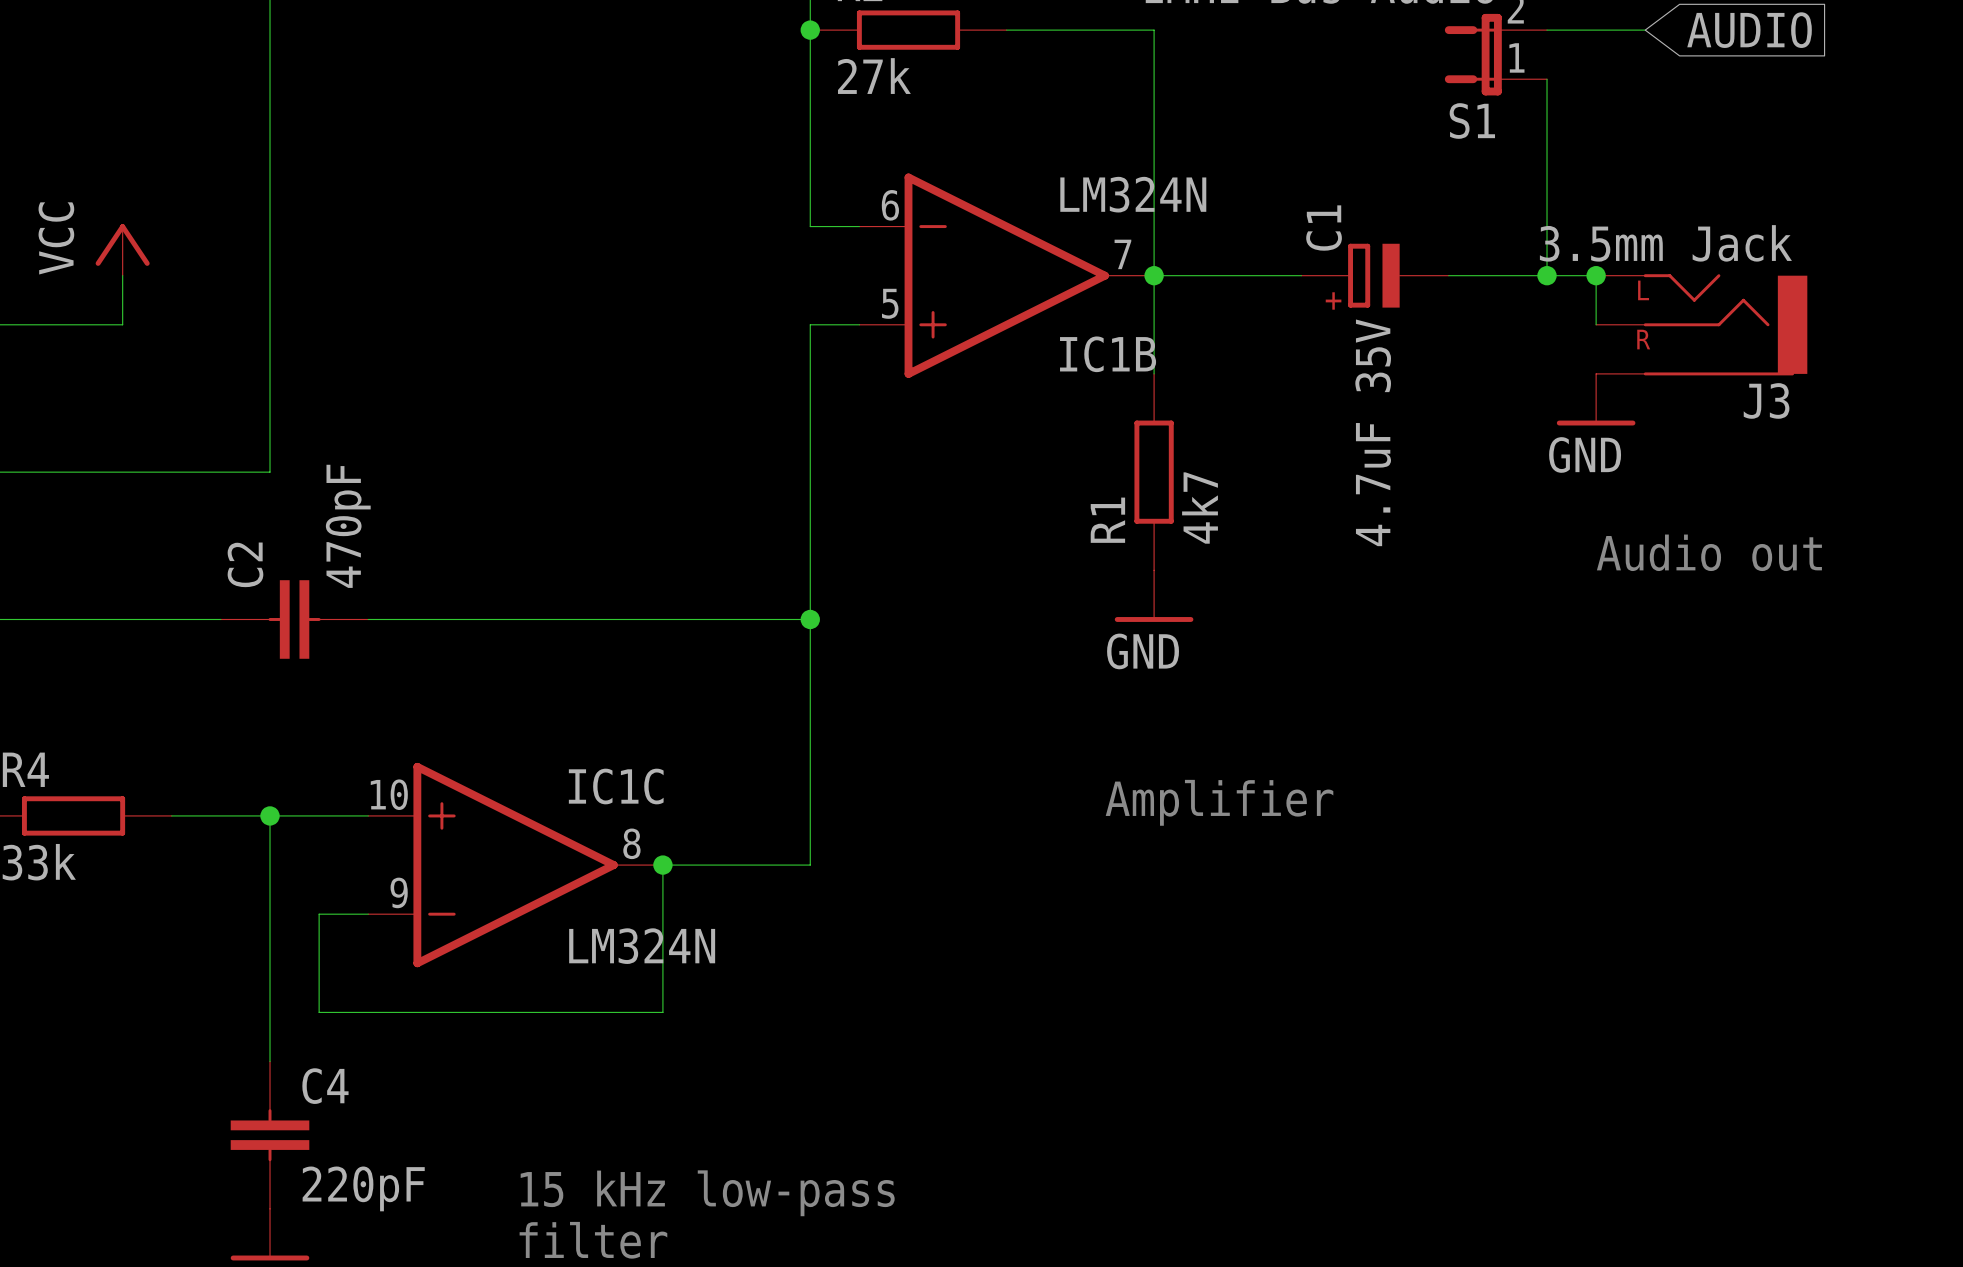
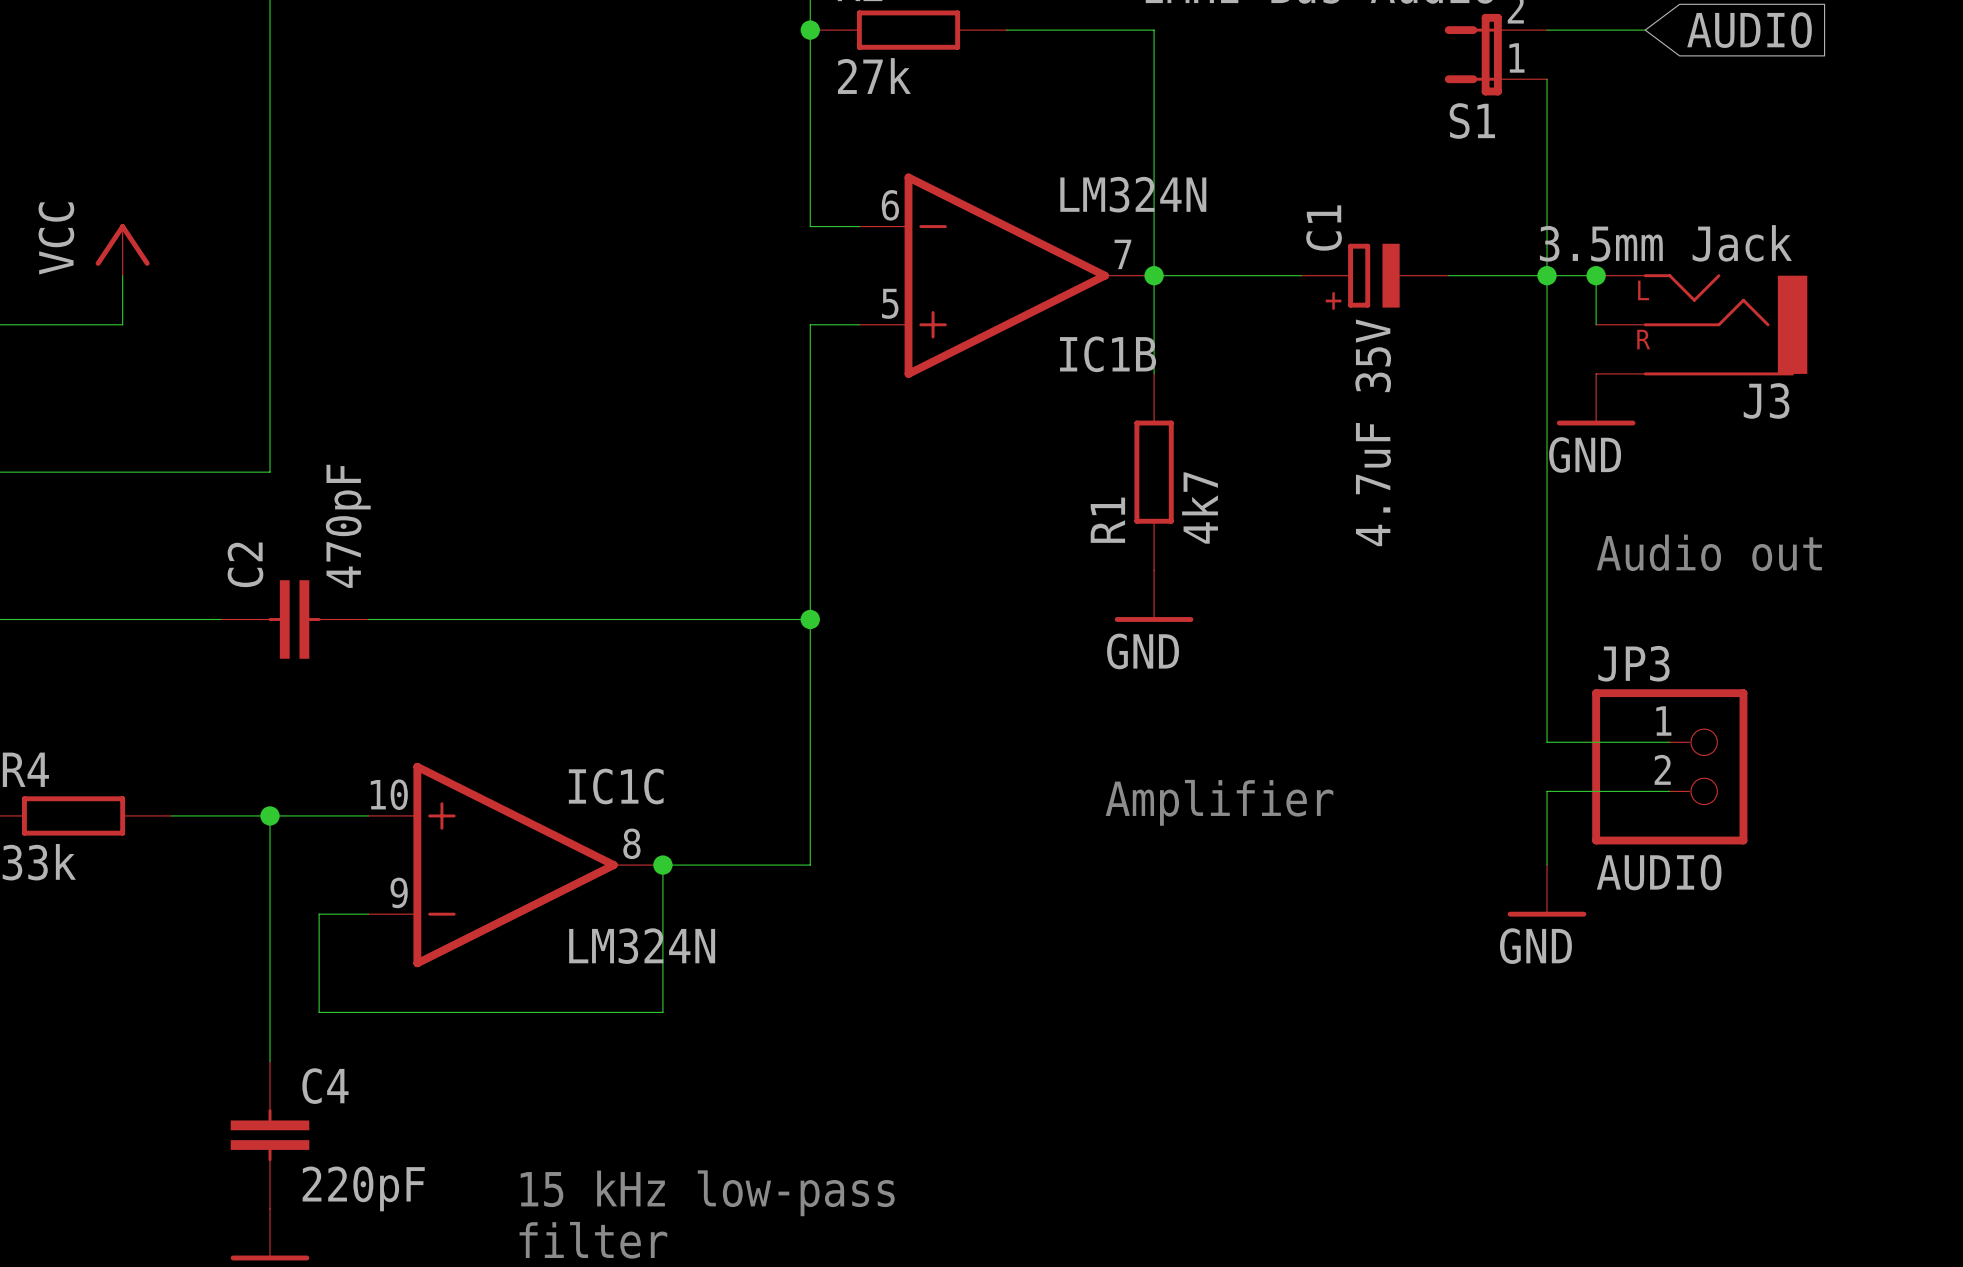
wire: none -> (1547, 275) (1547, 742) (1669, 742)
JP3: none -> AUDIO (1669, 766)
wire: none -> (1669, 791) (1547, 791) (1547, 865)
power symbol: none -> GND (1547, 890)

